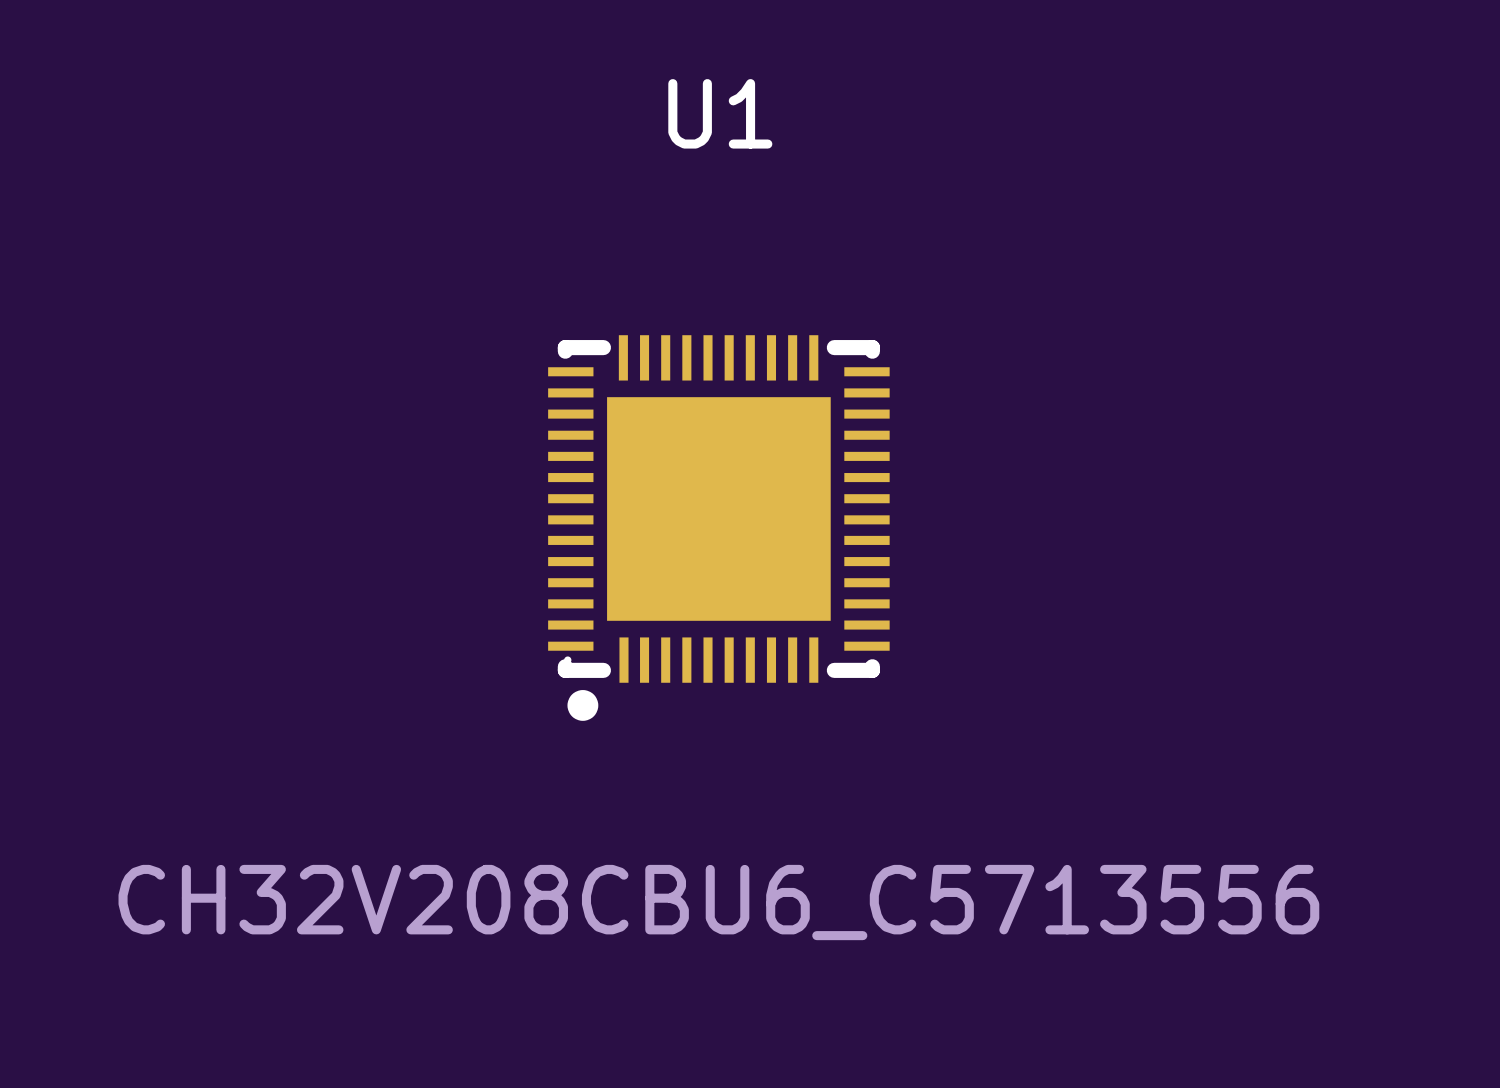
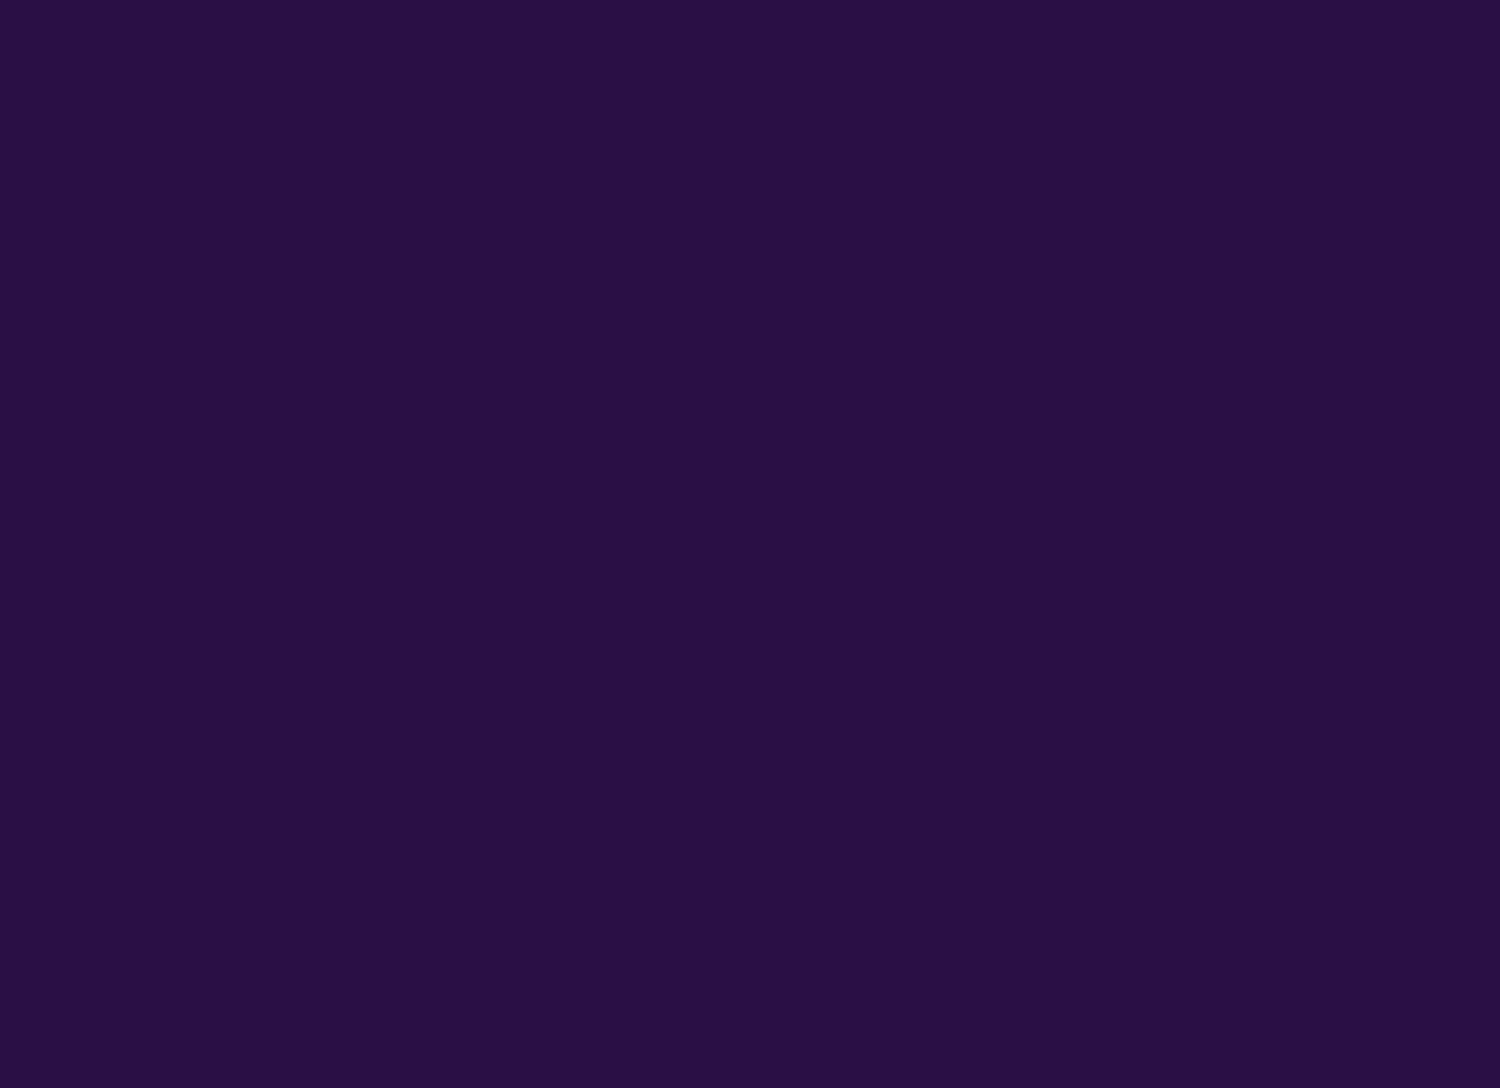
U1: CH32V208CBU6_C5713556 (718, 528) -> none

